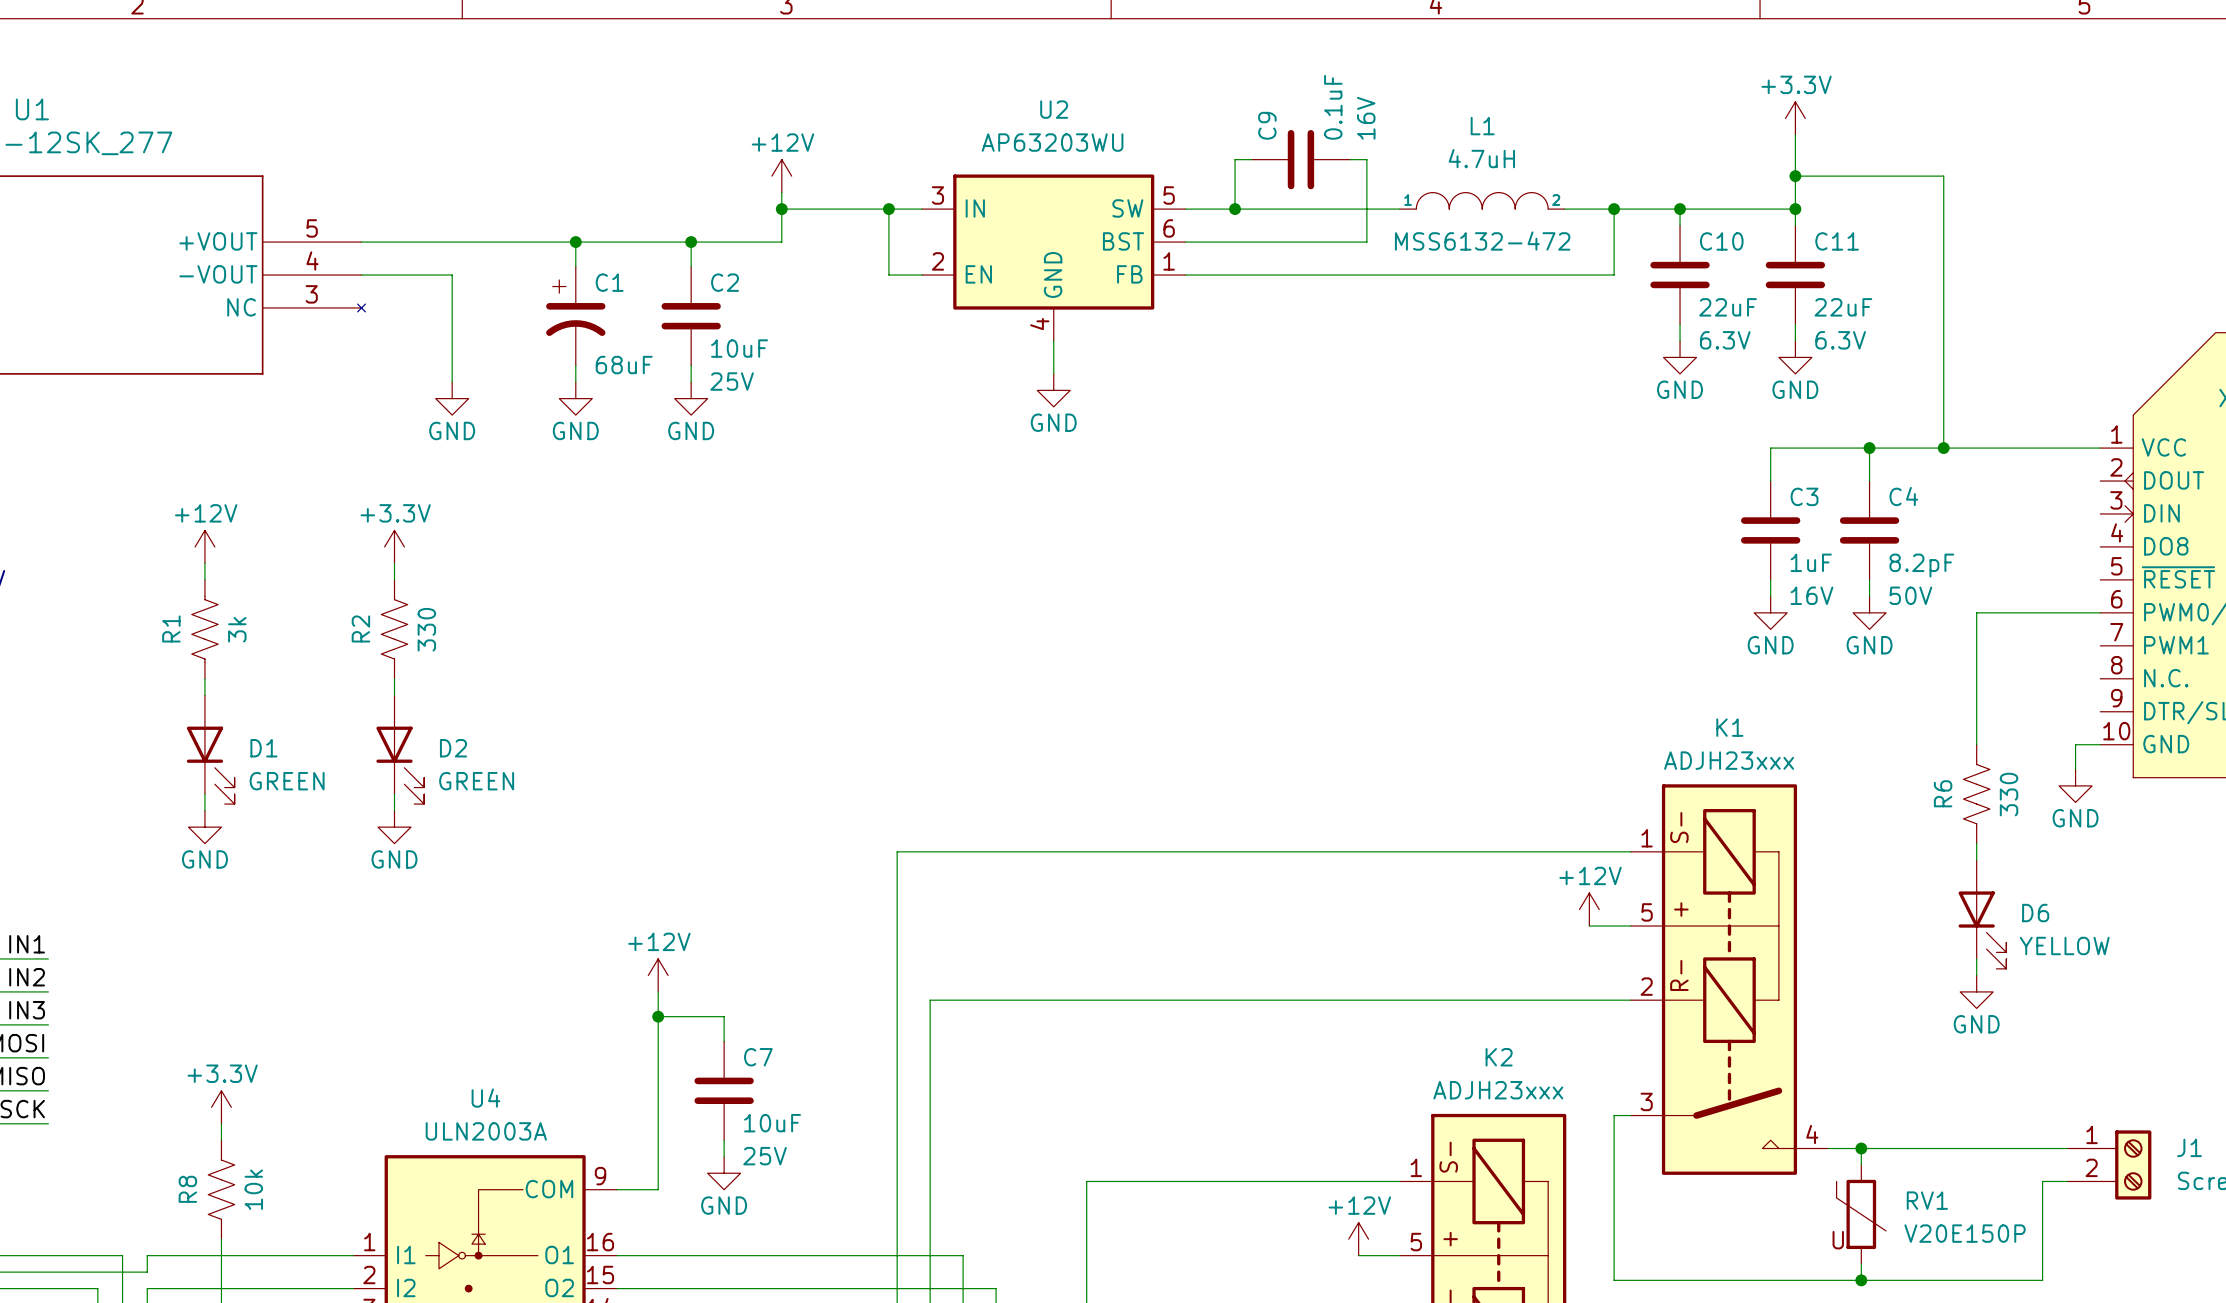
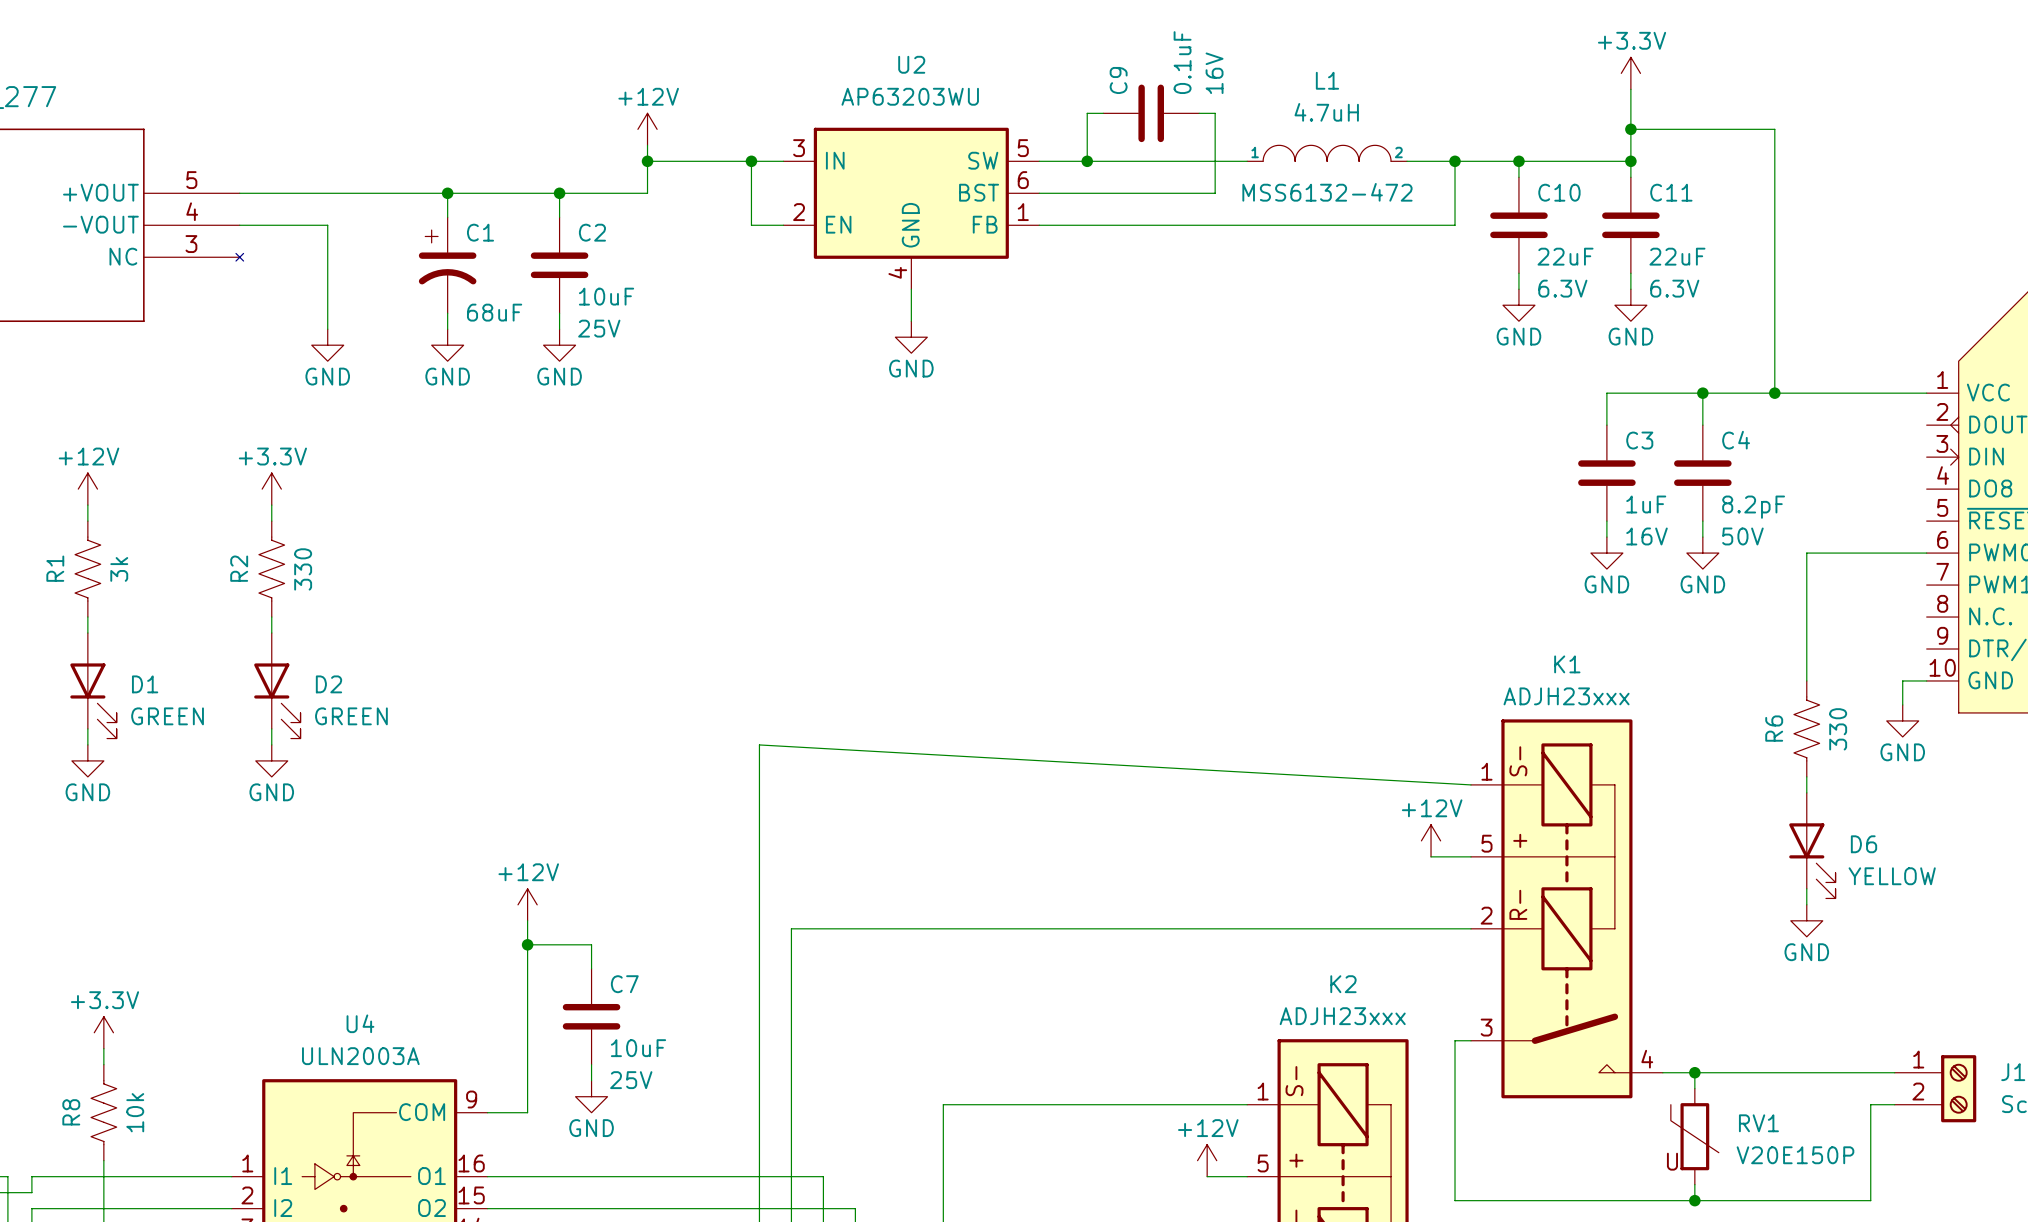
wire: (897, 851) (1630, 851) -> (759, 784) (759, 744) (1470, 784)

